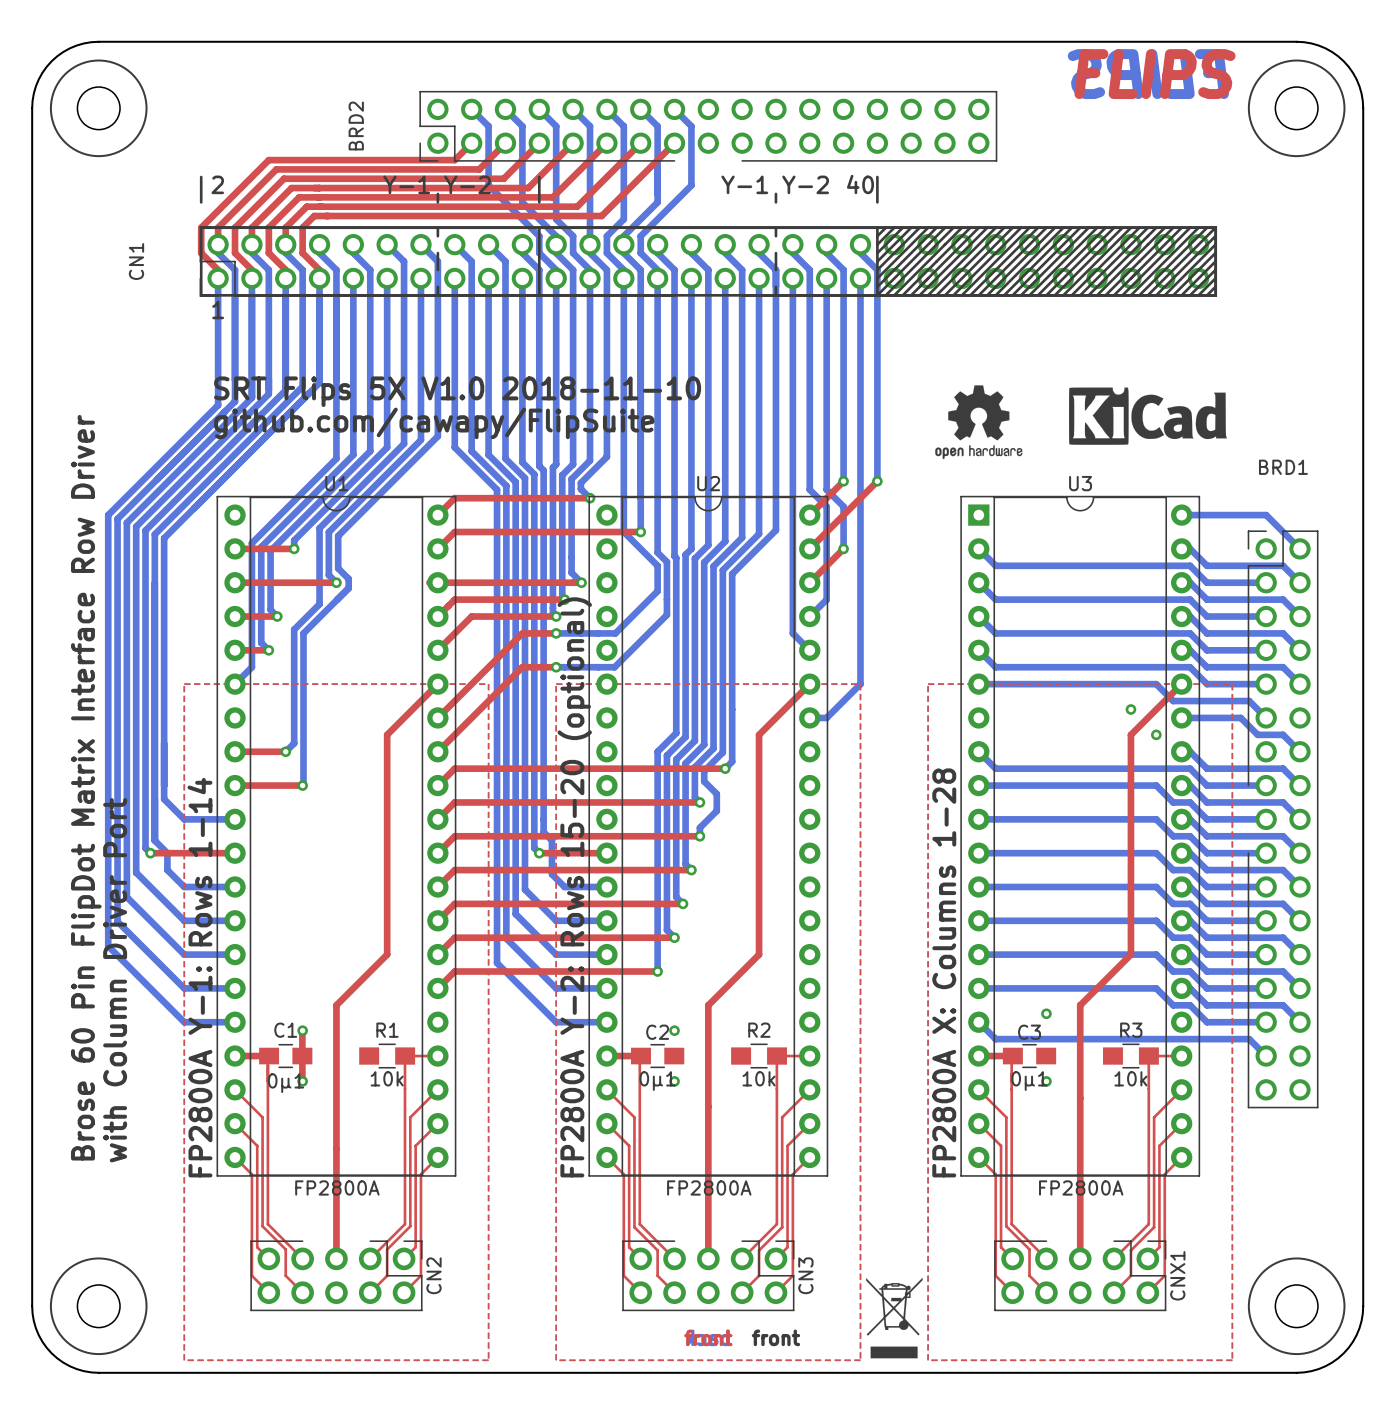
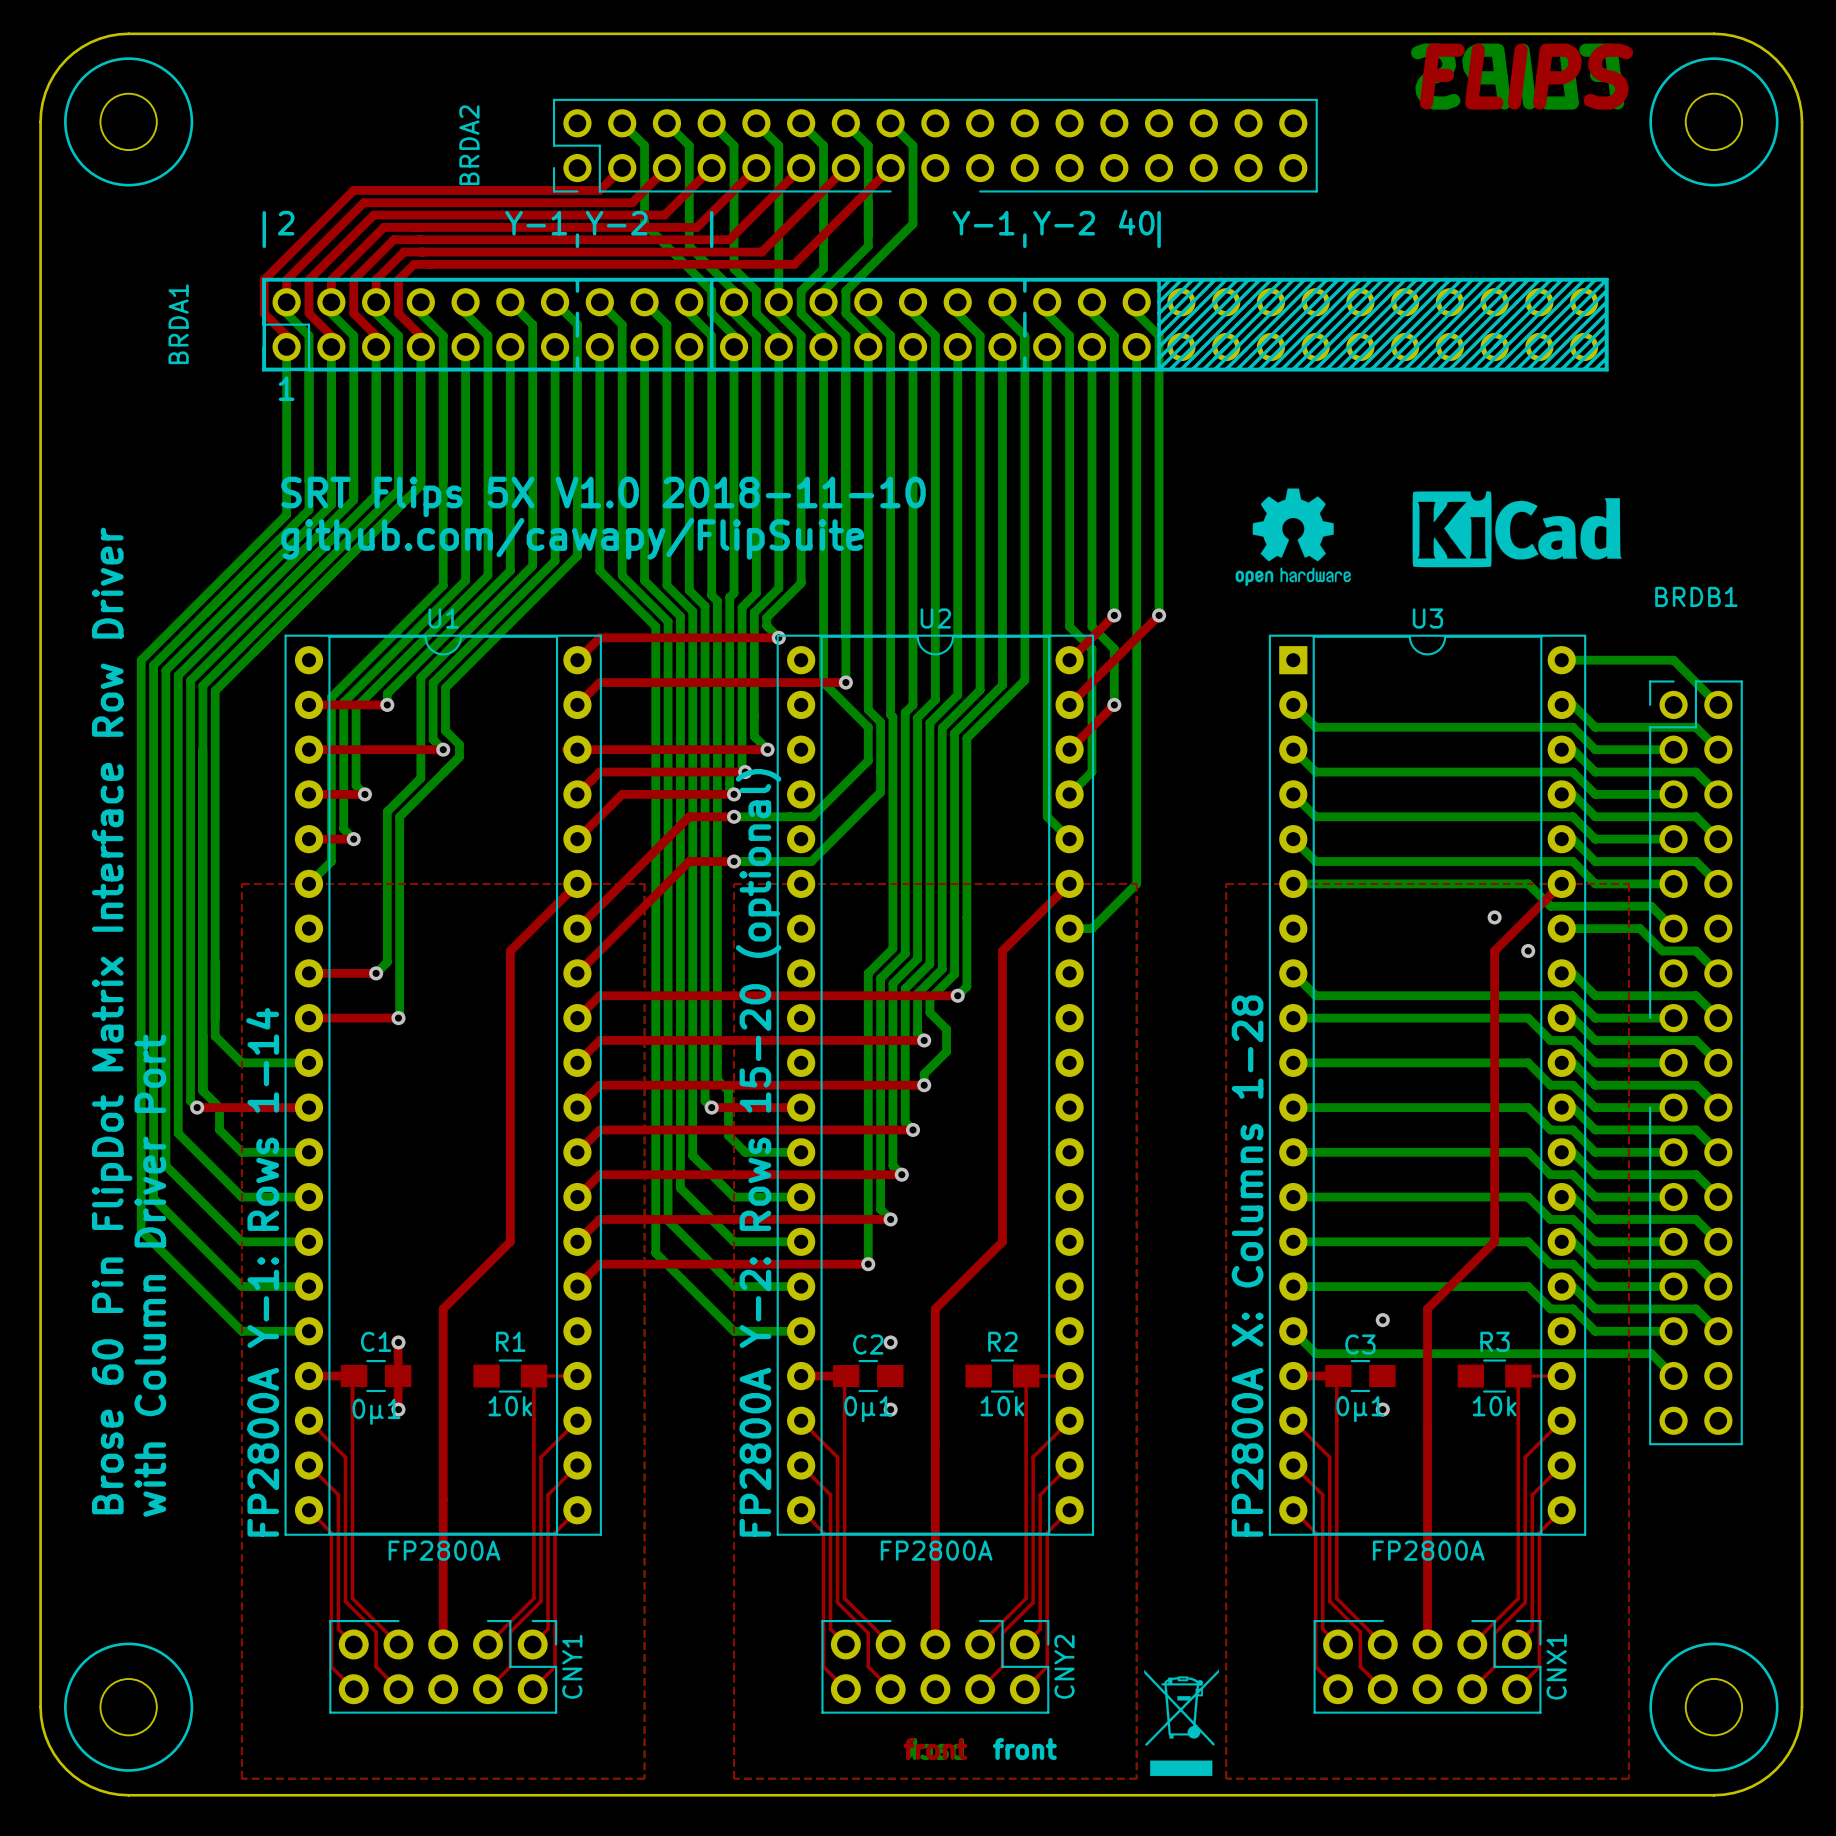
BRD2 name: BRD2 (356, 125) -> BRDA2 (469, 145)
CN1 name: CN1 (136, 261) -> BRDA1 (178, 324)
BRD1 name: BRD1 (1283, 467) -> BRDB1 (1696, 596)
CN2 name: CN2 (433, 1275) -> CNY1 (572, 1666)
CN3 name: CN3 (805, 1275) -> CNY2 (1064, 1666)

